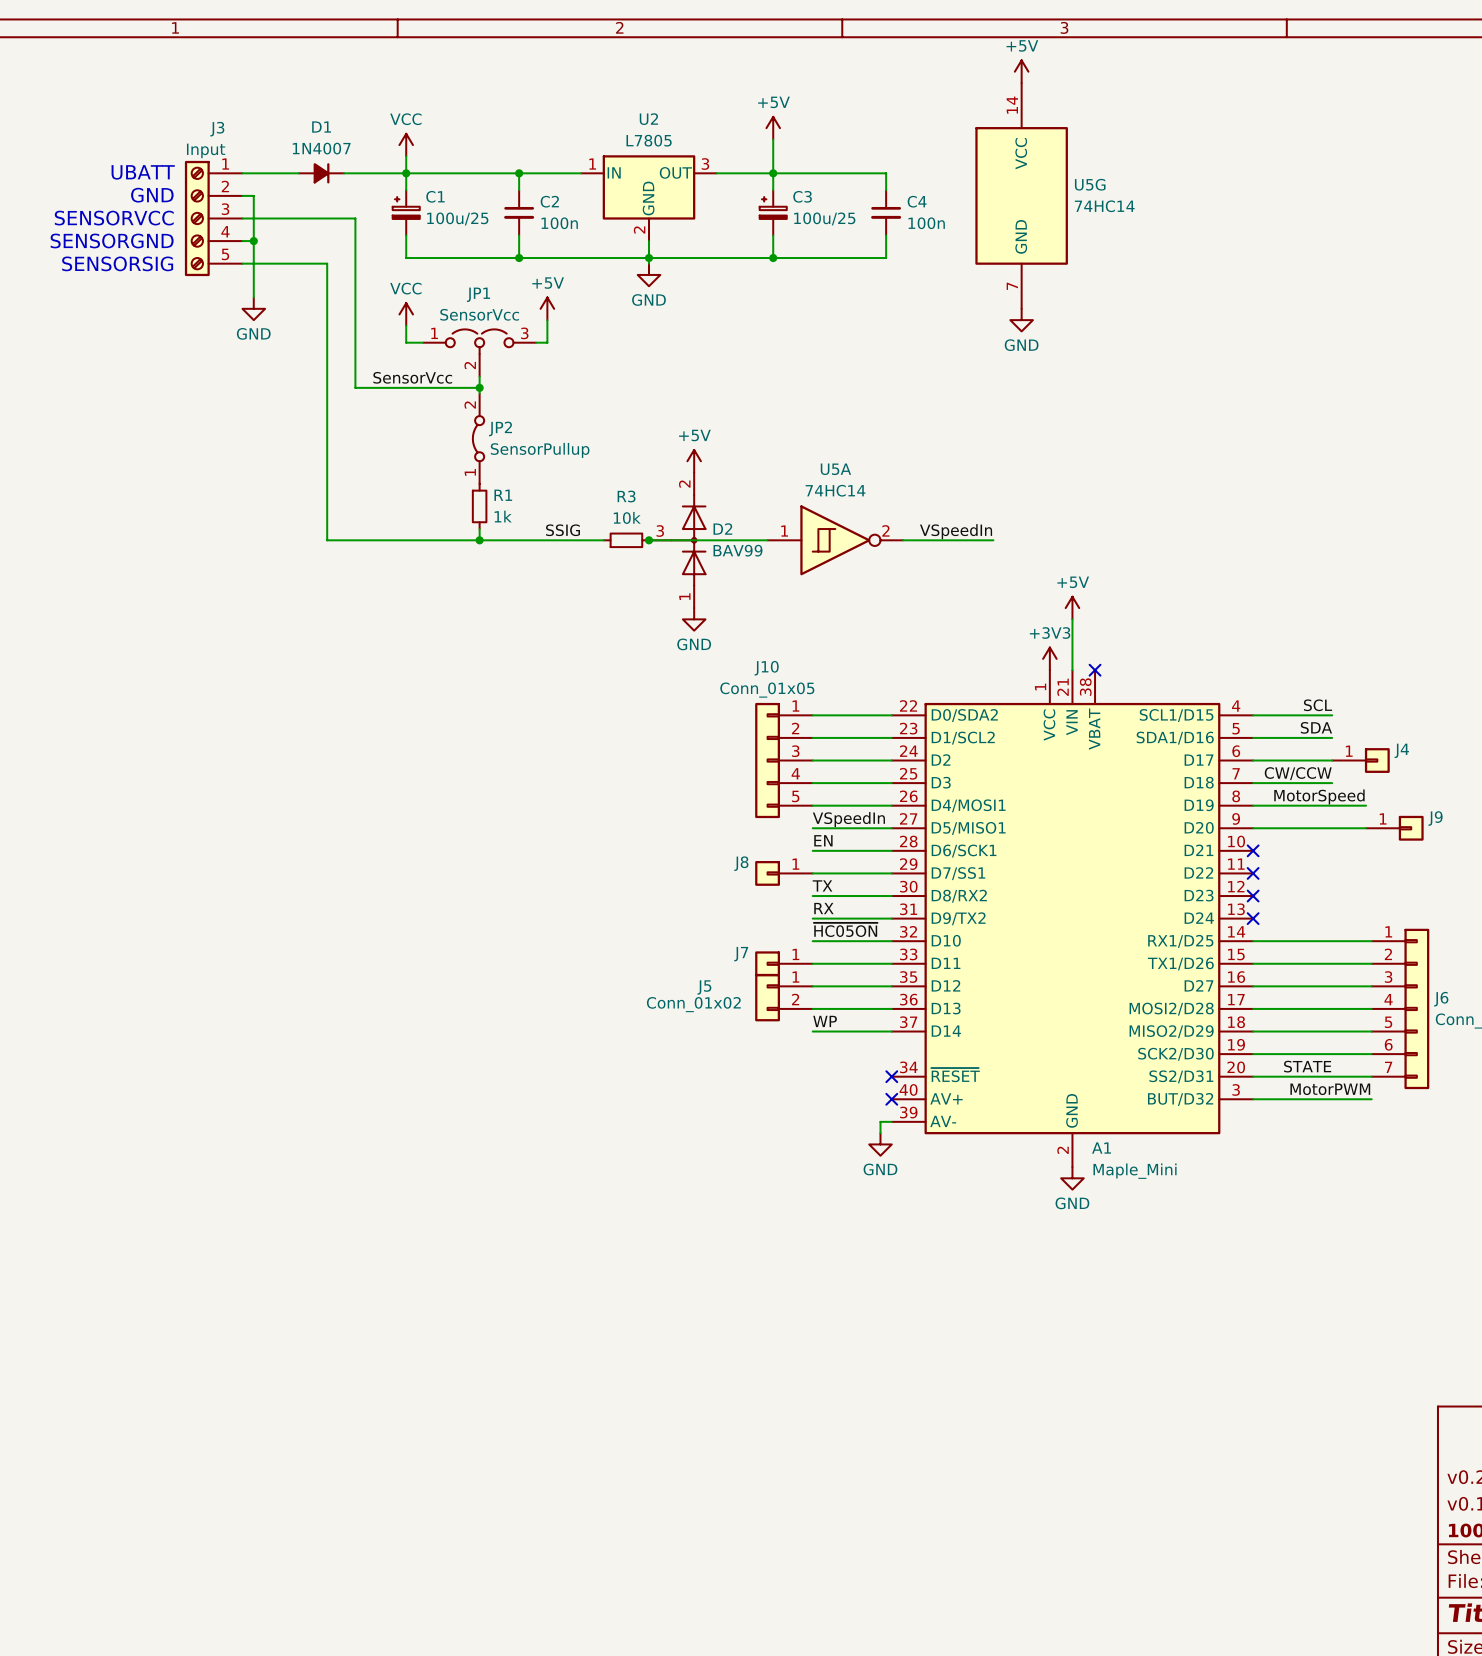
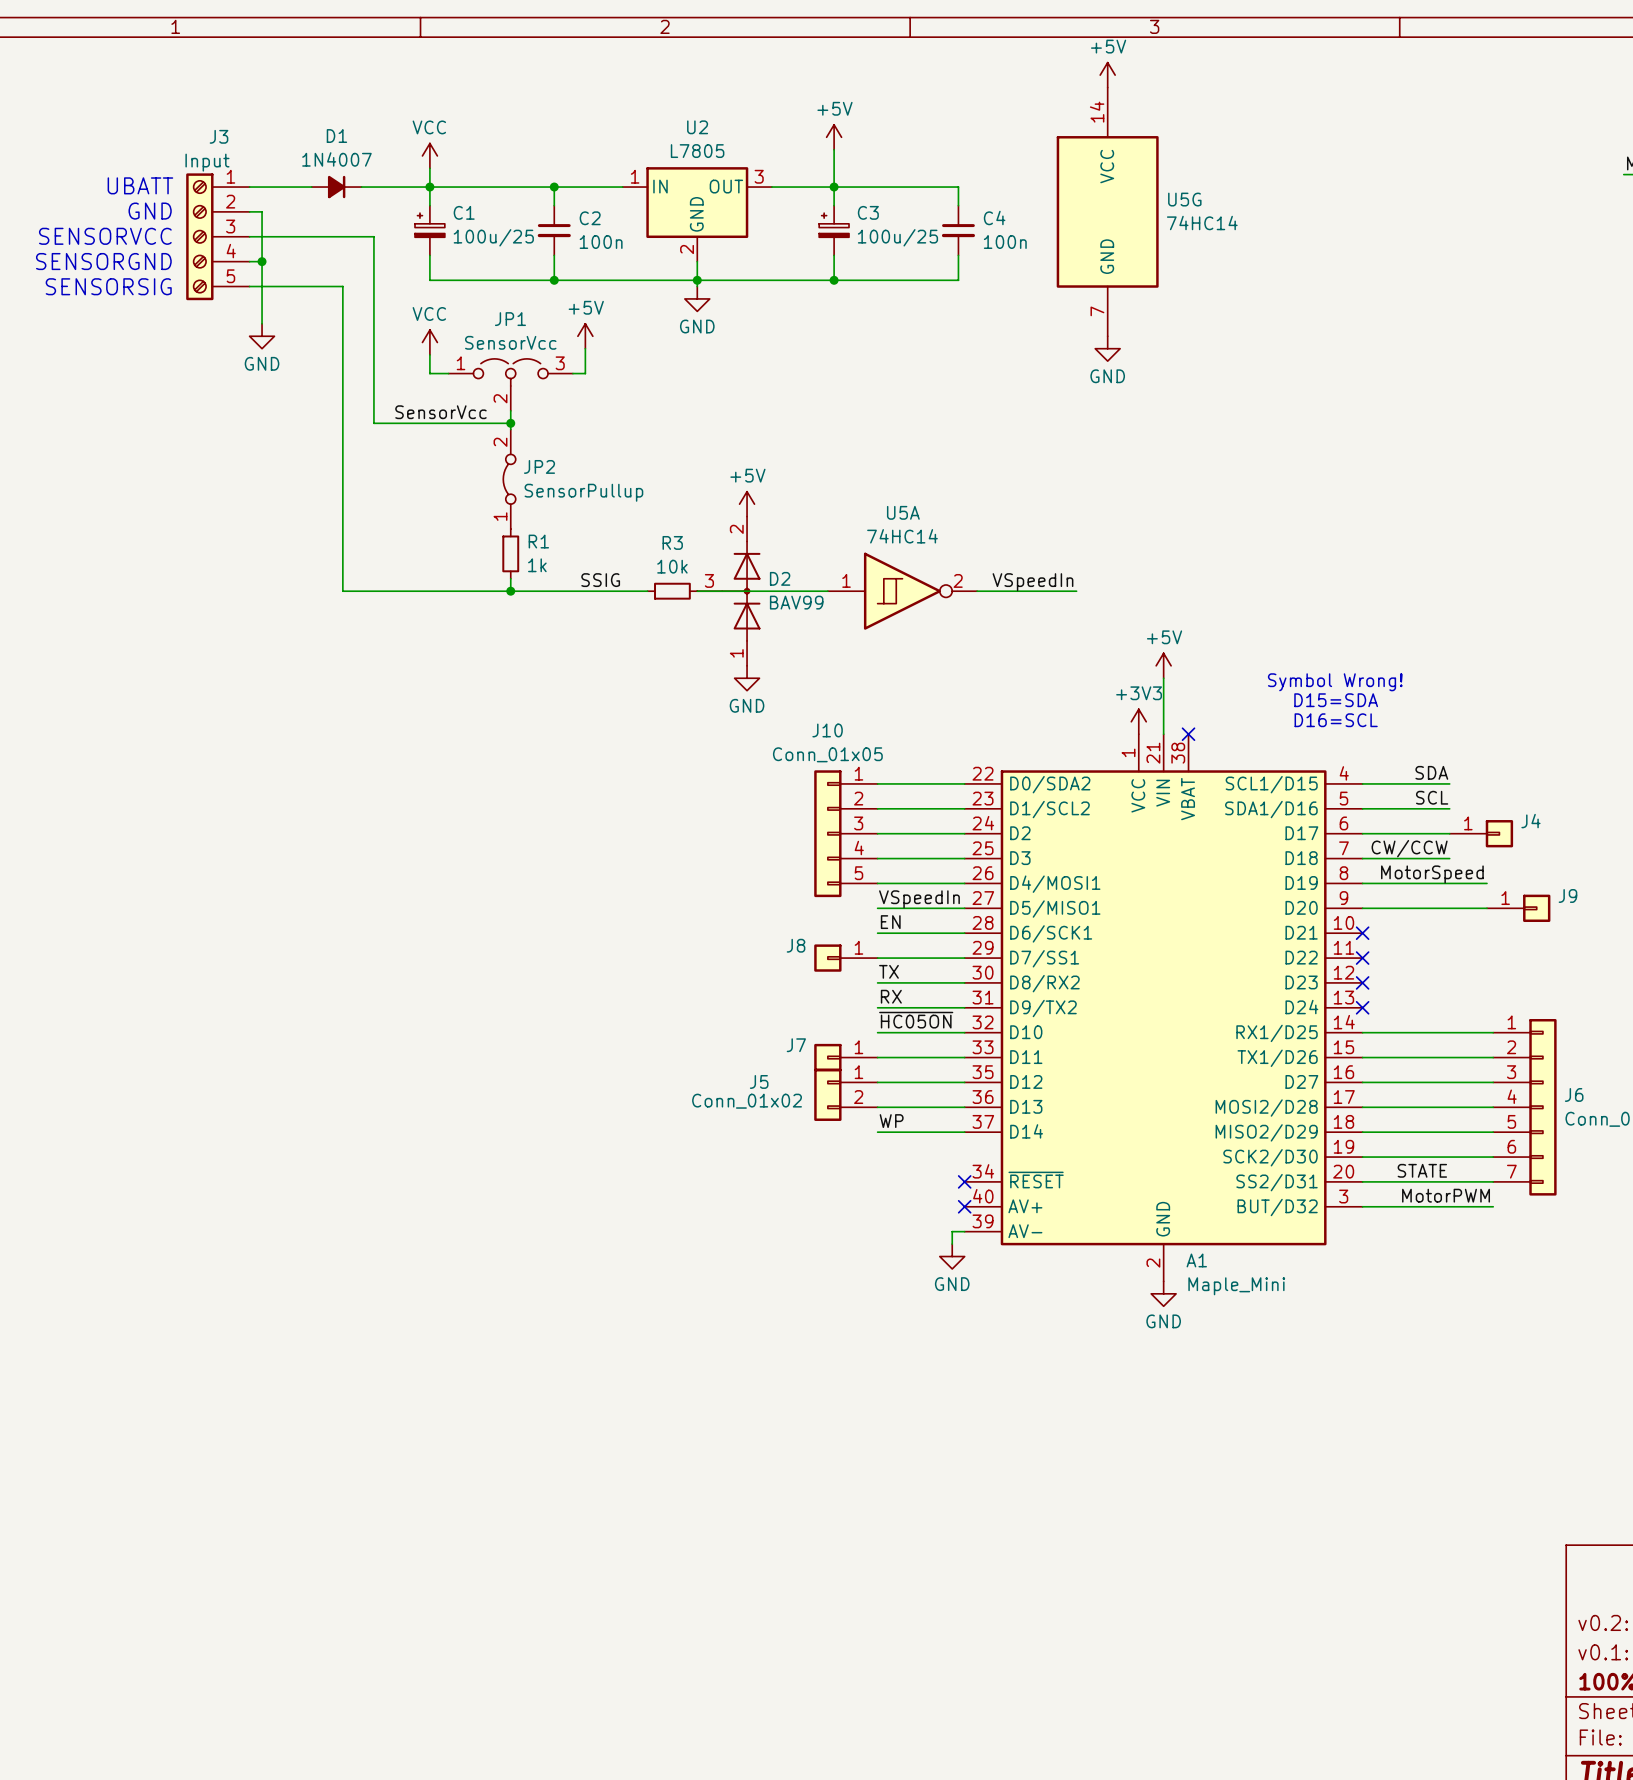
junction: (649, 540) -> none
text: none -> Symbol Wrong! (1335, 682)
text: none -> D15=SDA (1336, 700)
text: none -> D16=SCL (1336, 720)
label: SCL (1318, 705) -> SDA (1431, 772)
label: SDA (1316, 727) -> SCL (1432, 797)

